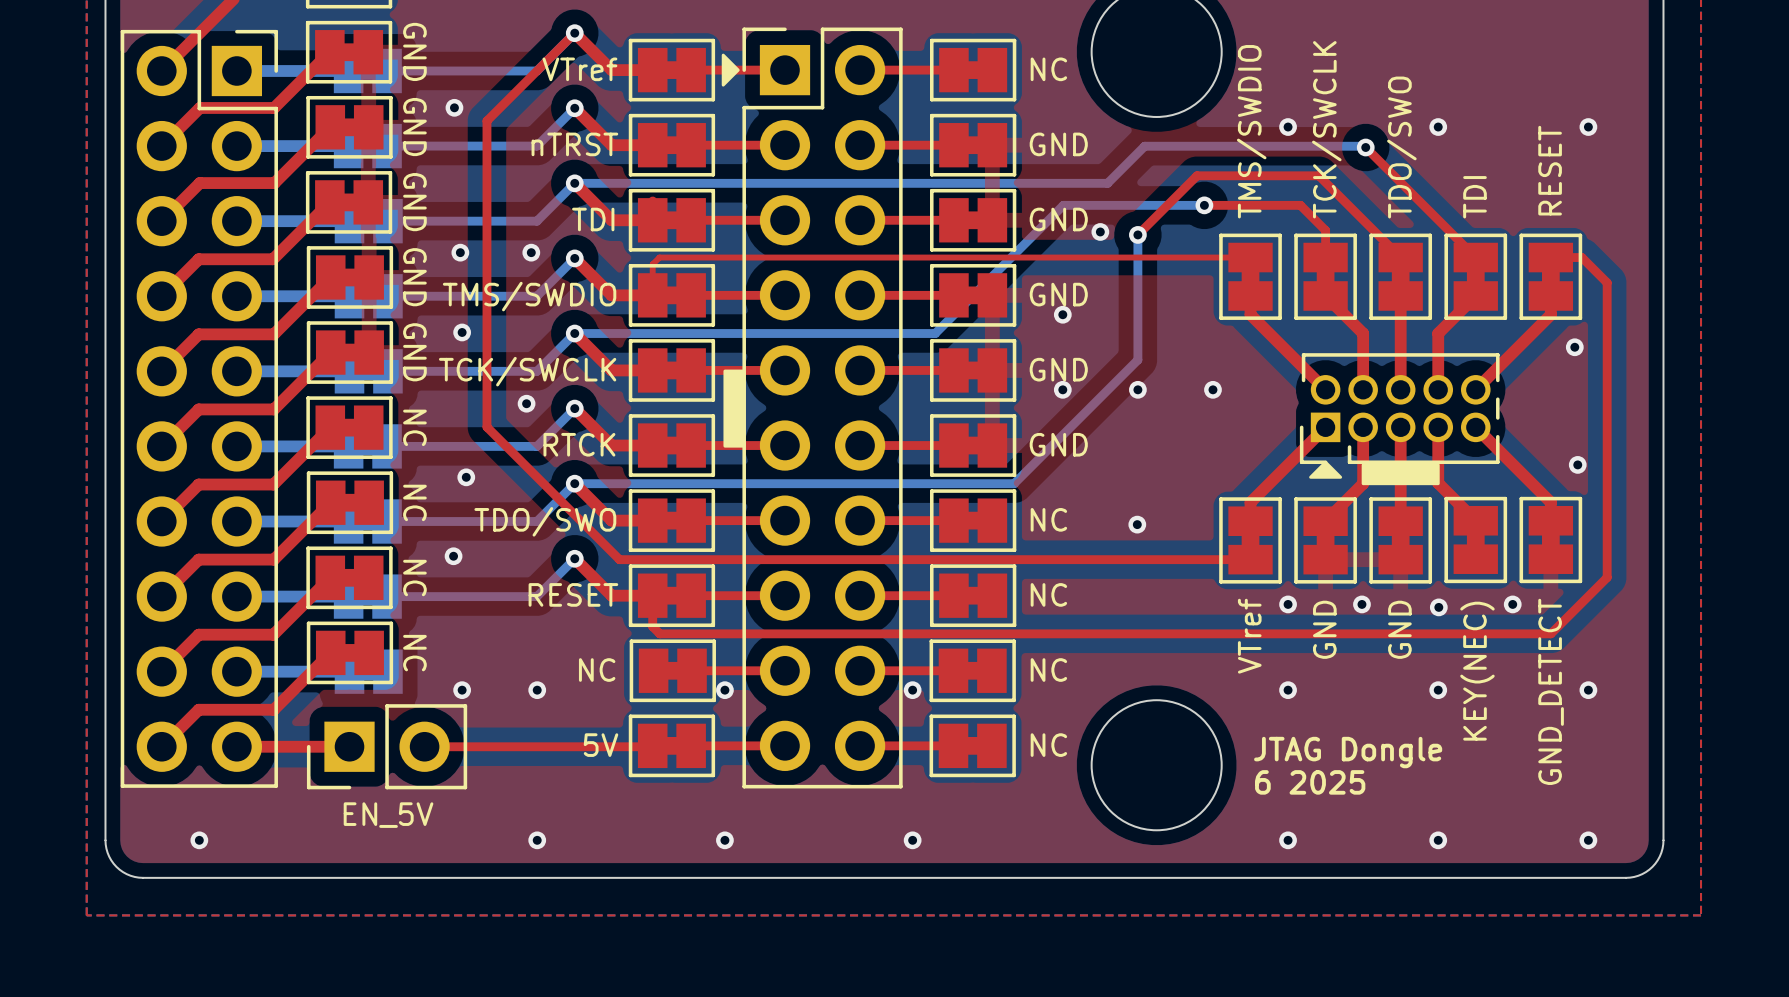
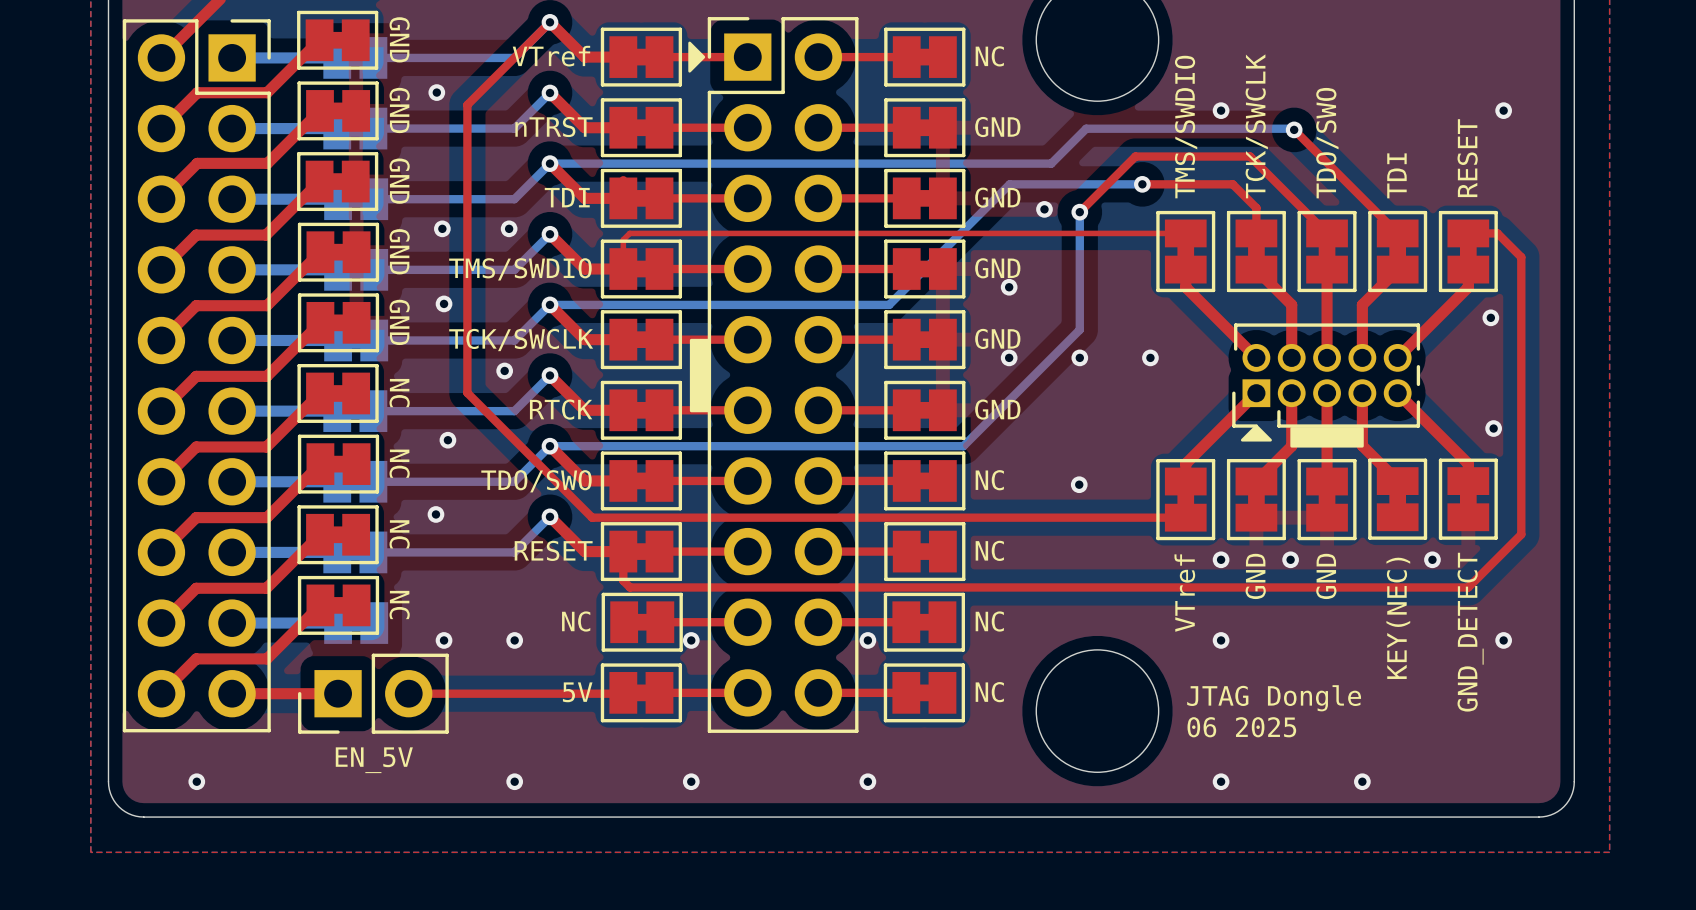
via: (1438, 127) -> none
via: (1438, 607) -> none
via: (1438, 690) -> none
text: 6 2025 (1310, 782) -> 06 2025 (1241, 727)
via: (1588, 840) -> none

